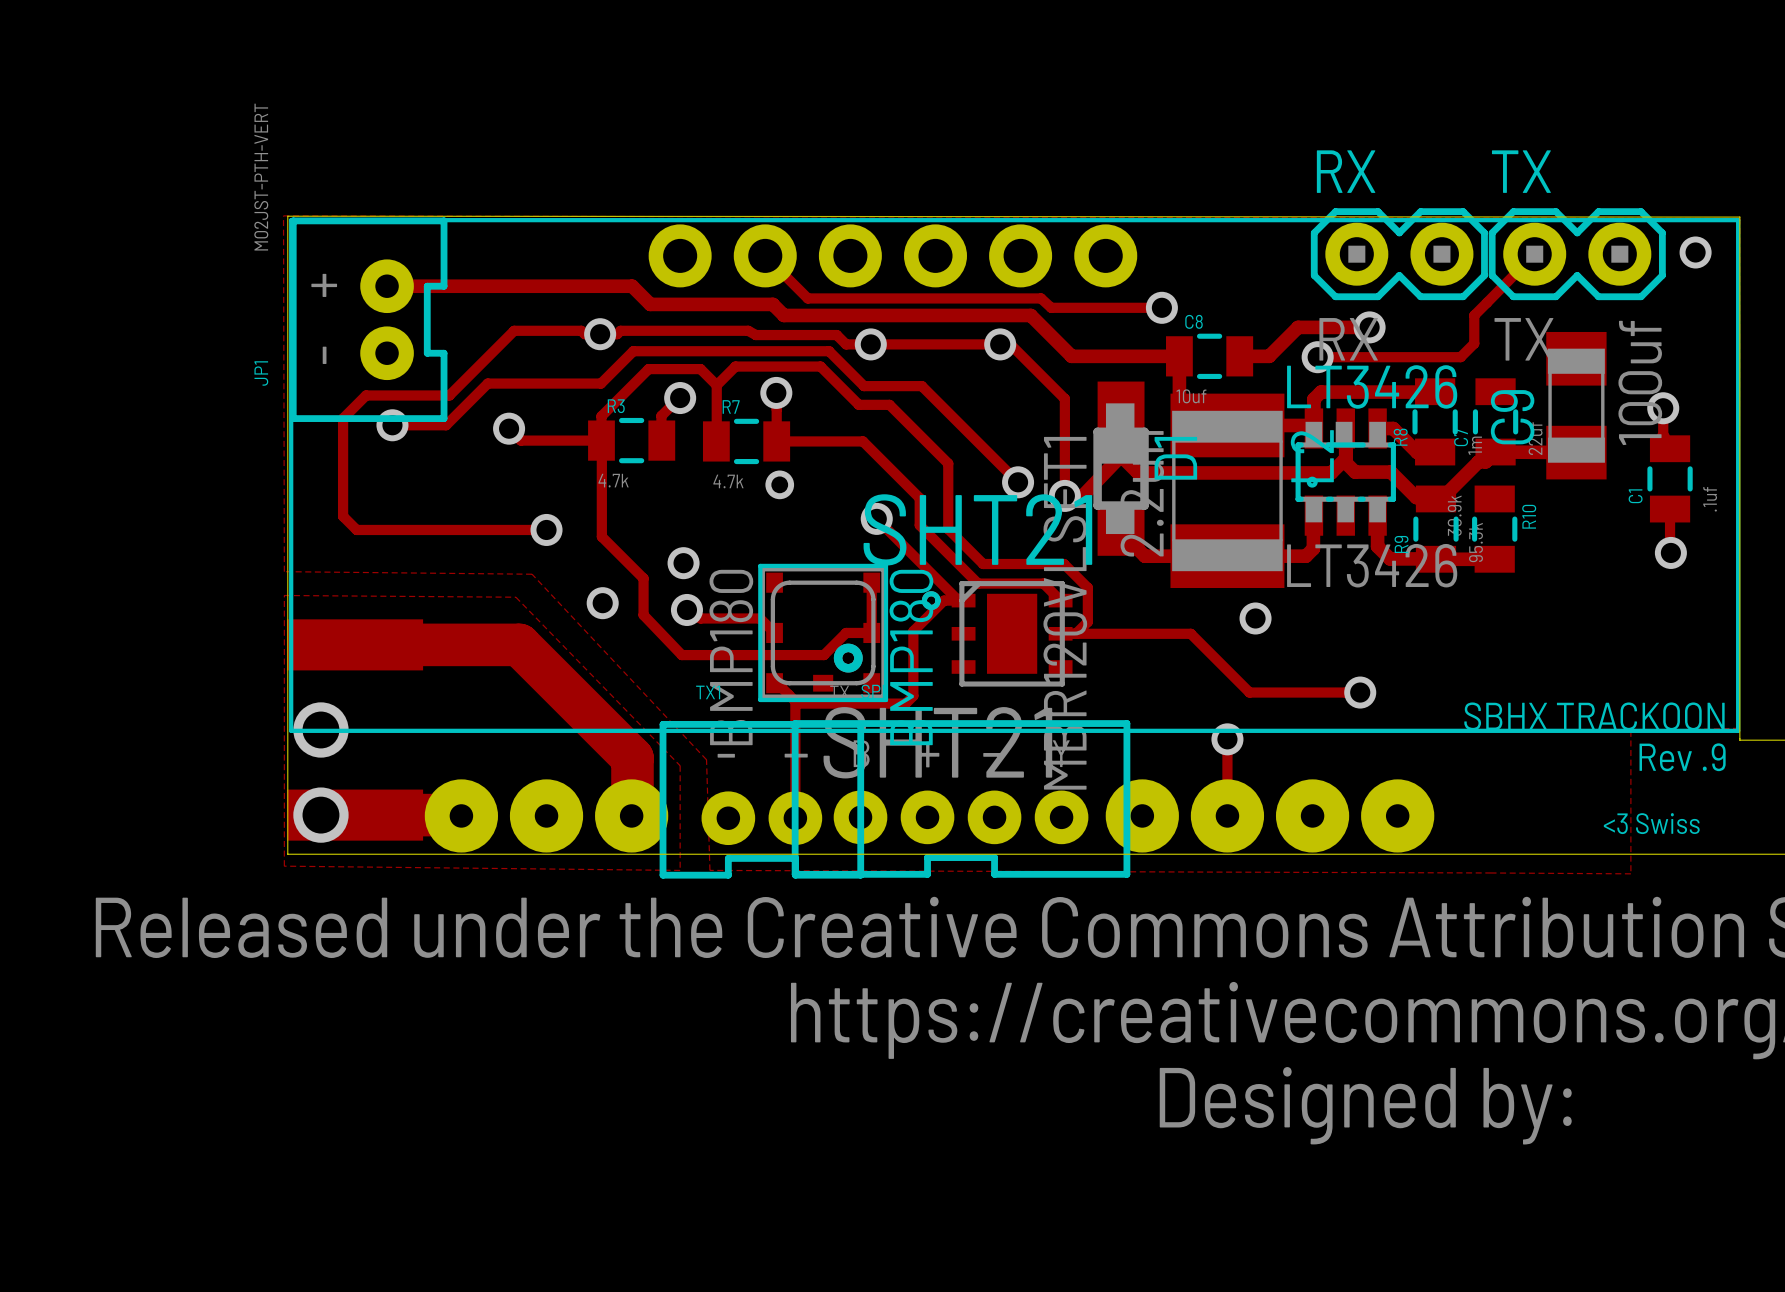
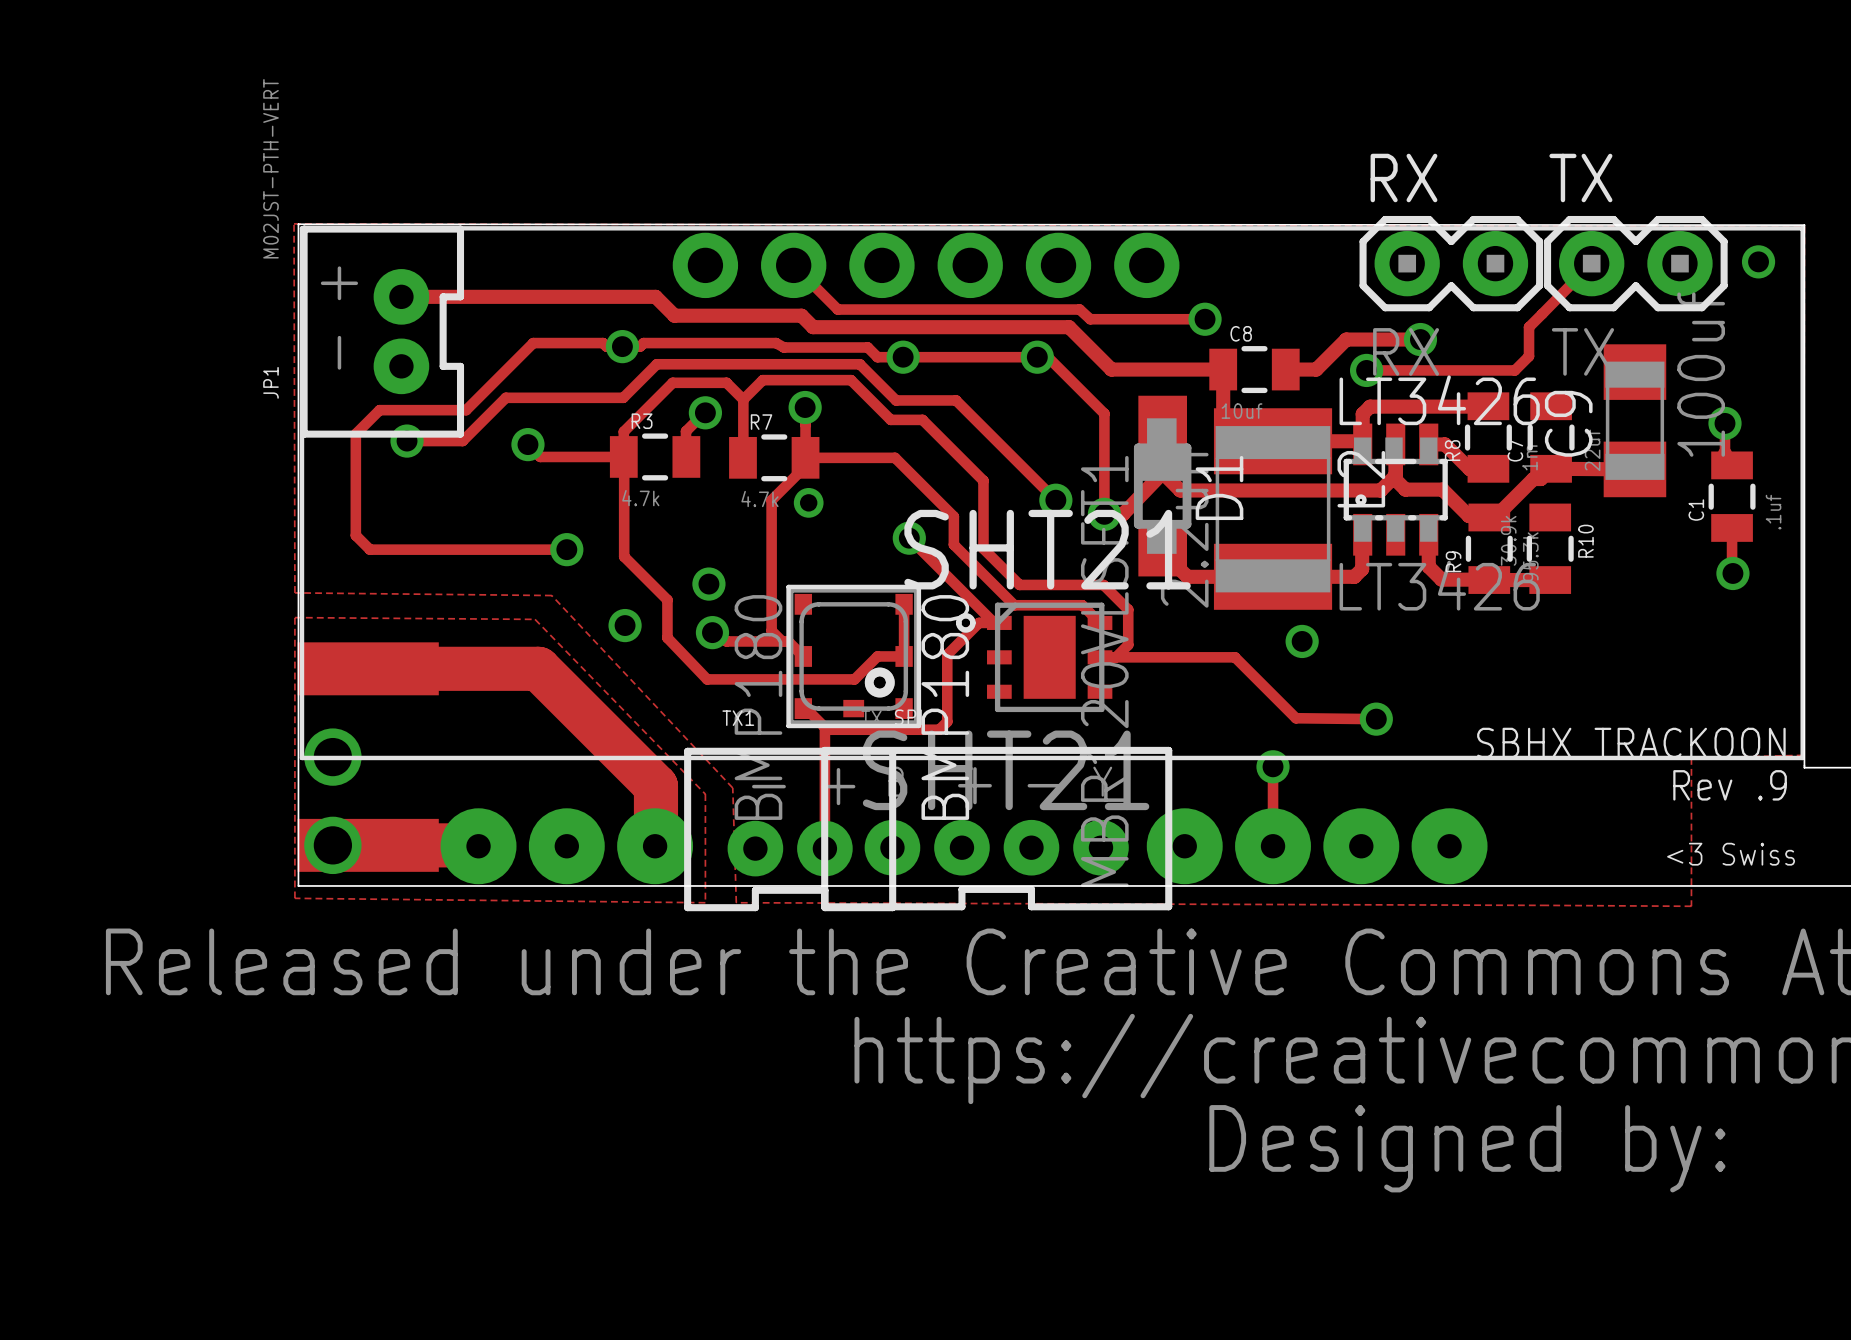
track: none -> (805, 457) (805, 466) (771, 500) (771, 630) (782, 641)
track: (1249, 692) (1360, 692) -> (1295, 718) (1375, 718)
via position: (1360, 692) -> (1376, 719)

